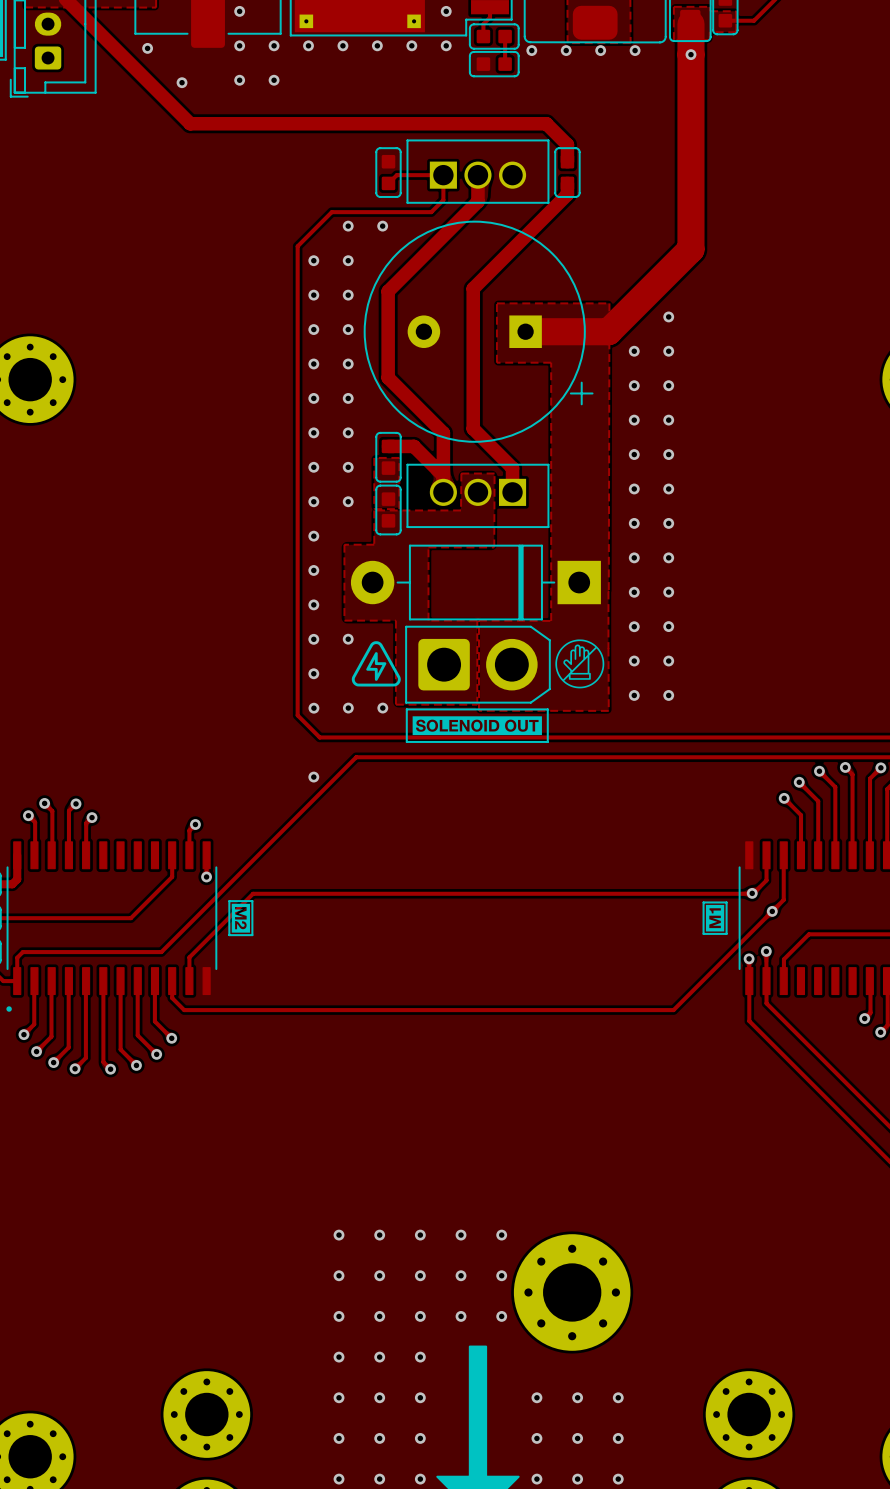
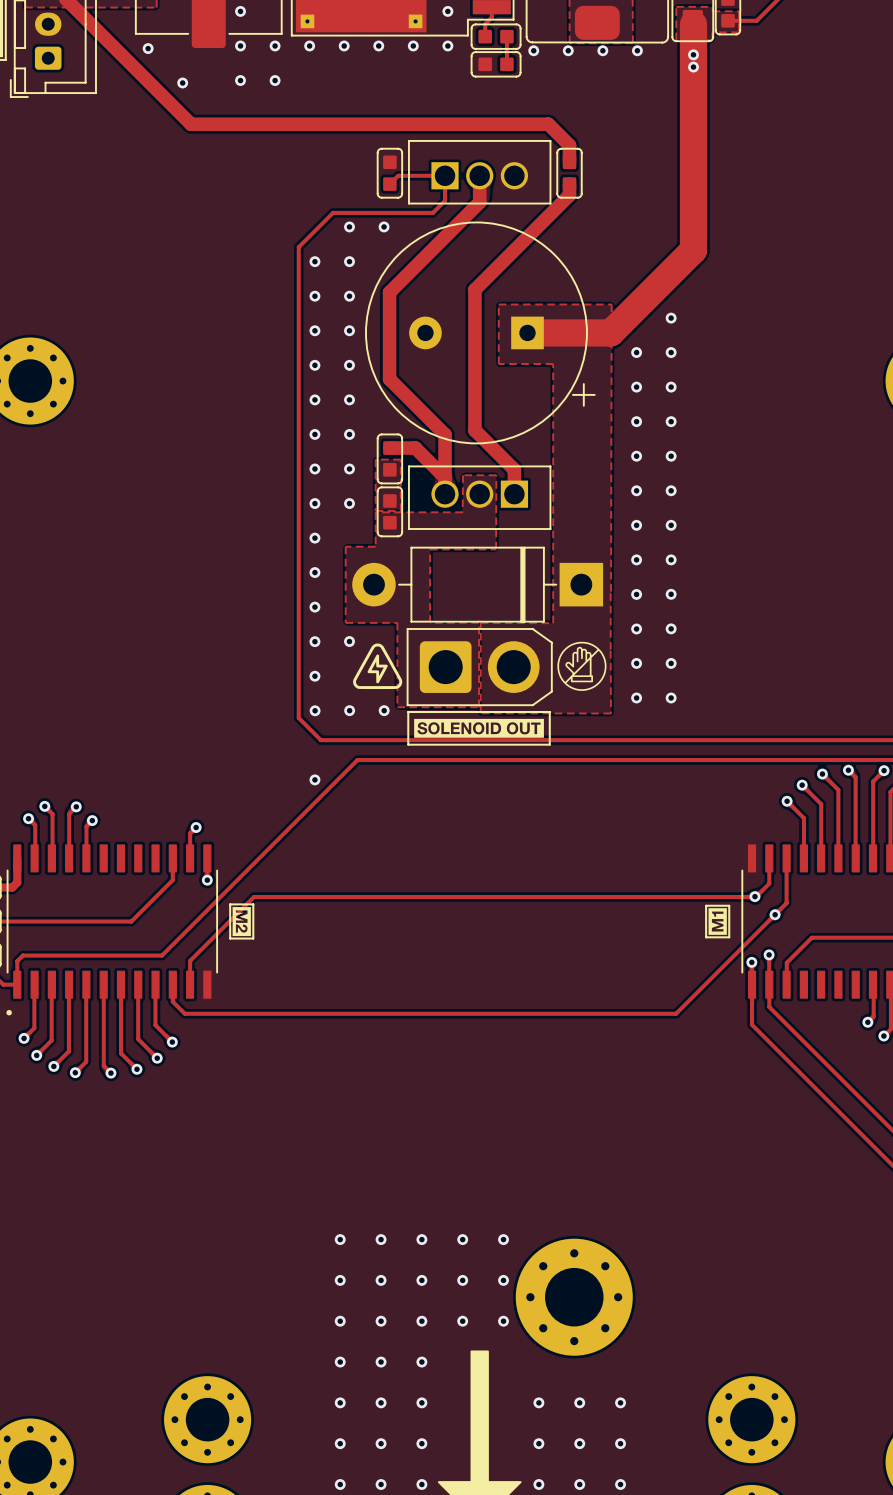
via: none -> (693, 67)

